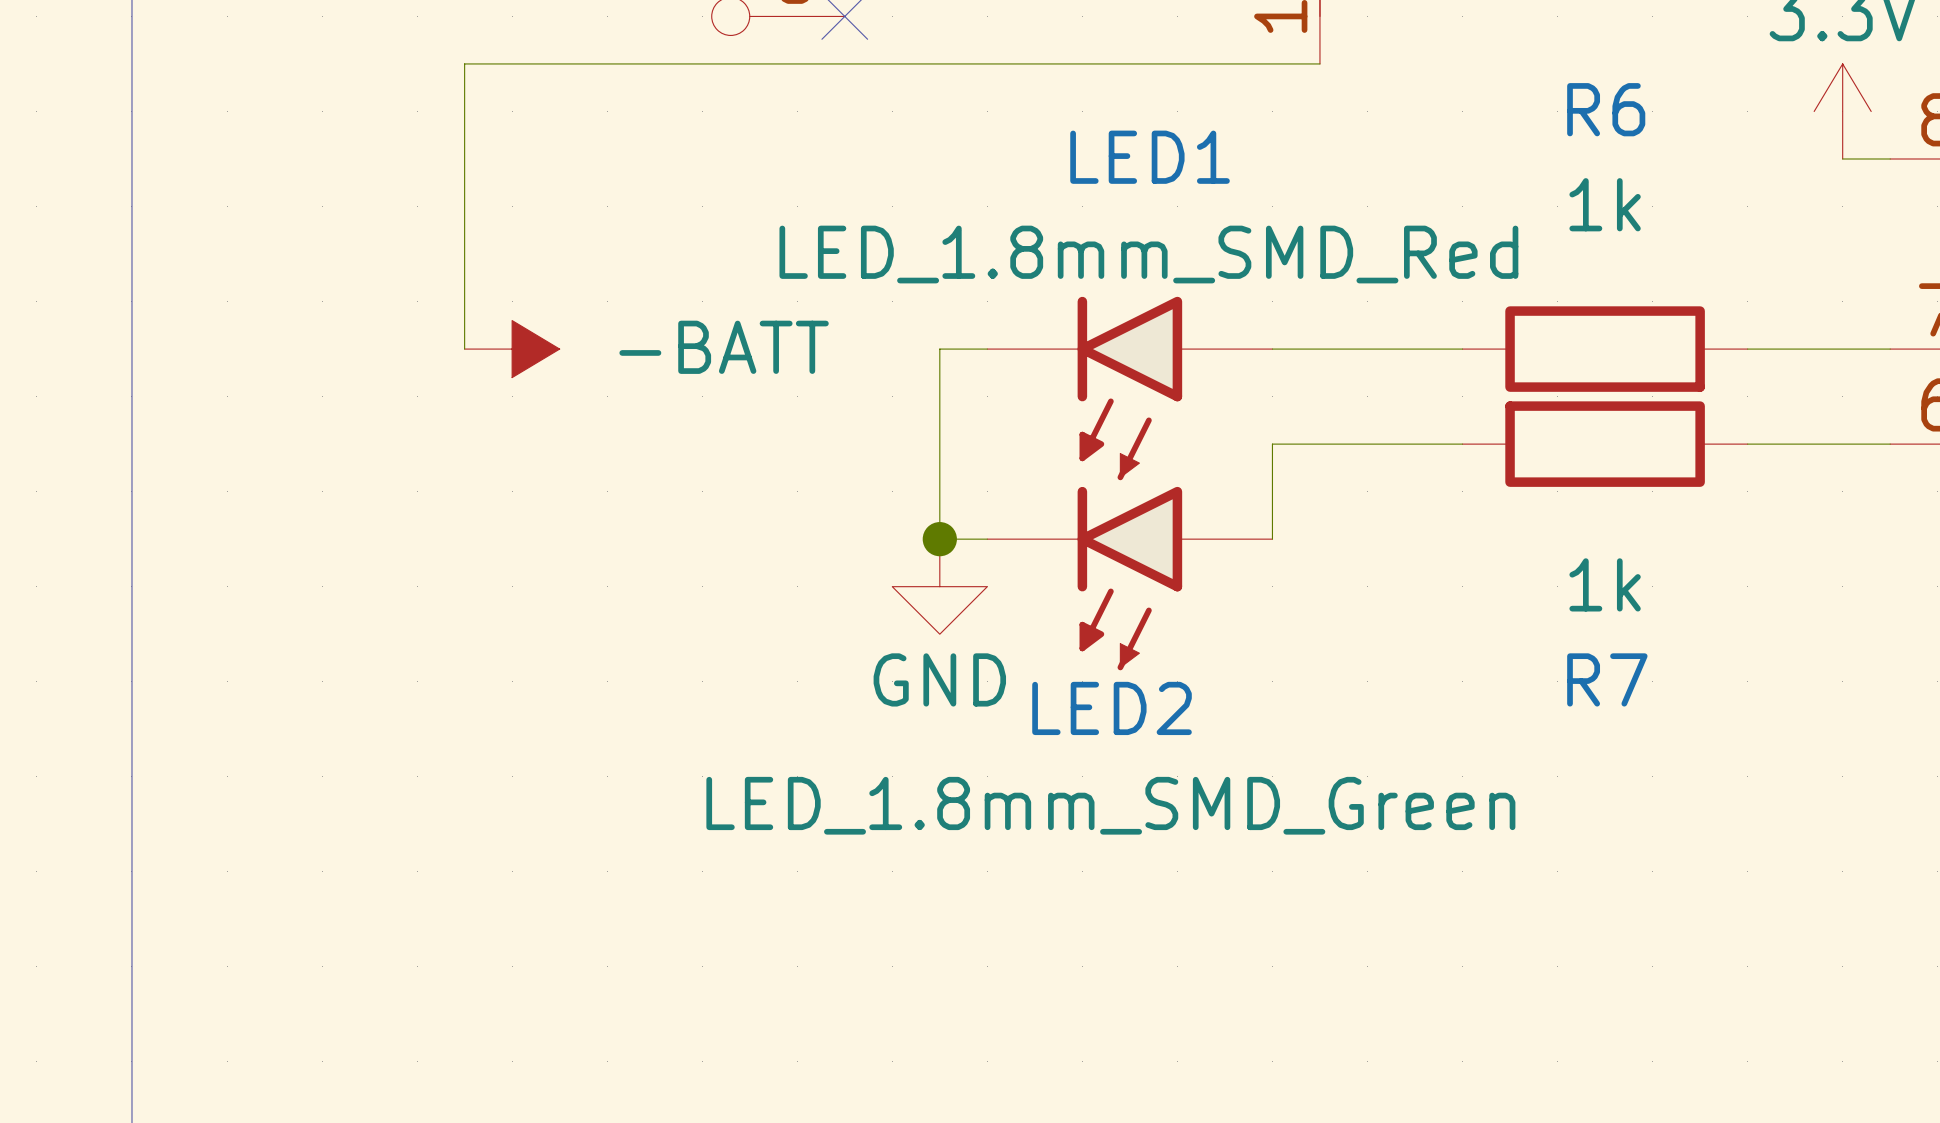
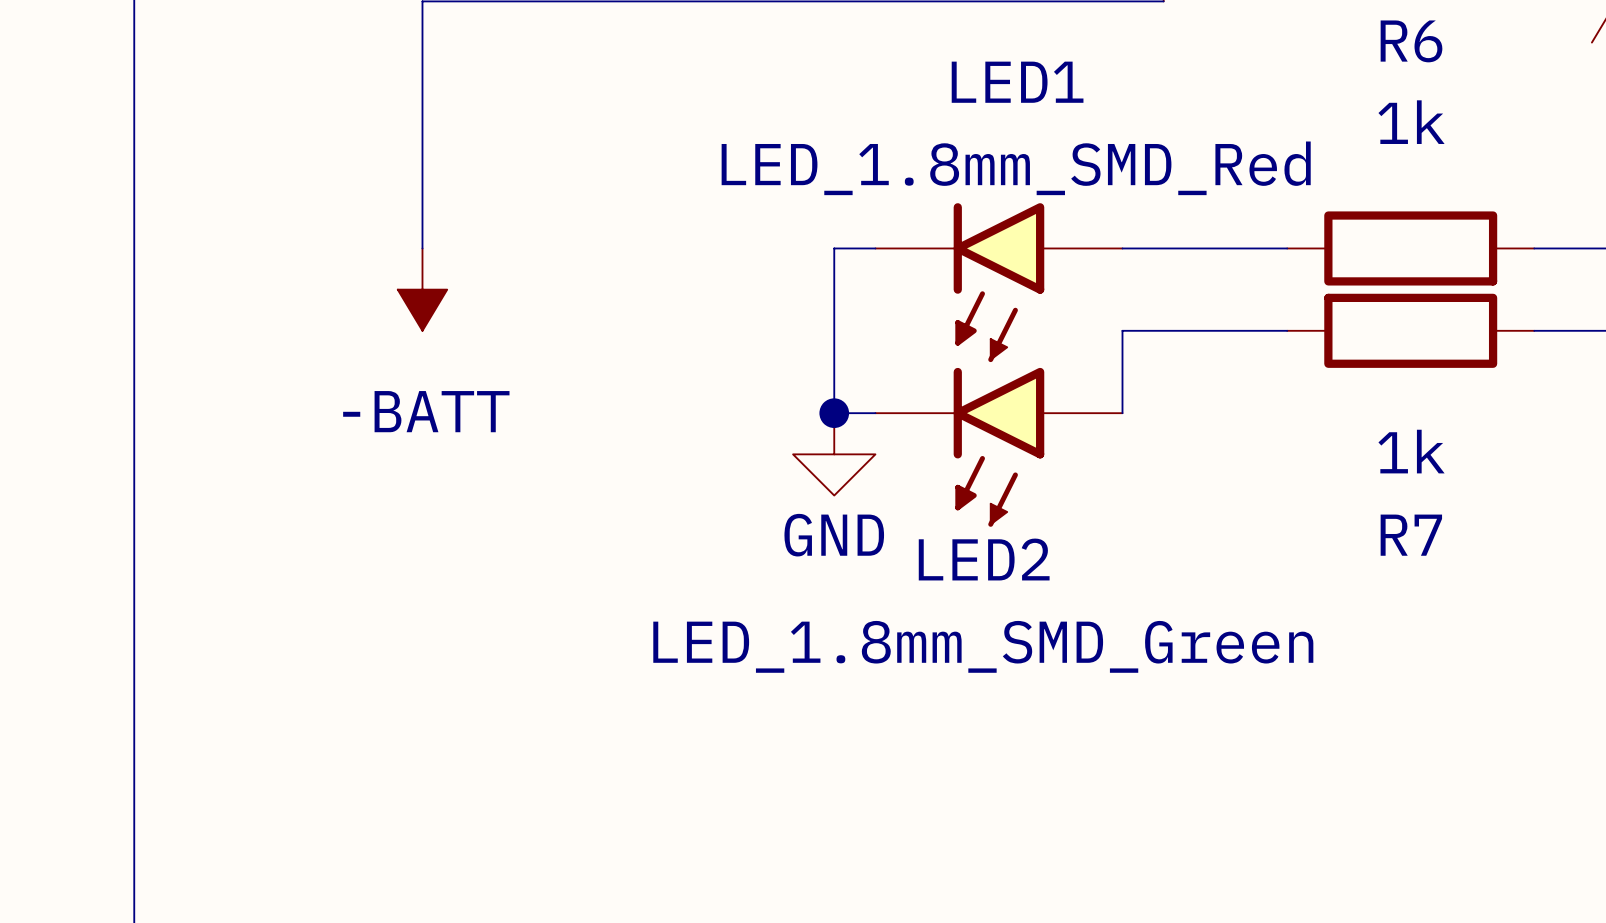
power symbol text position: -BATT (724, 347) -> -BATT (426, 411)
power symbol rotation: 0° (512, 349) -> 90° clockwise (422, 289)
power symbol position: -BATT (512, 349) -> -BATT (422, 289)

